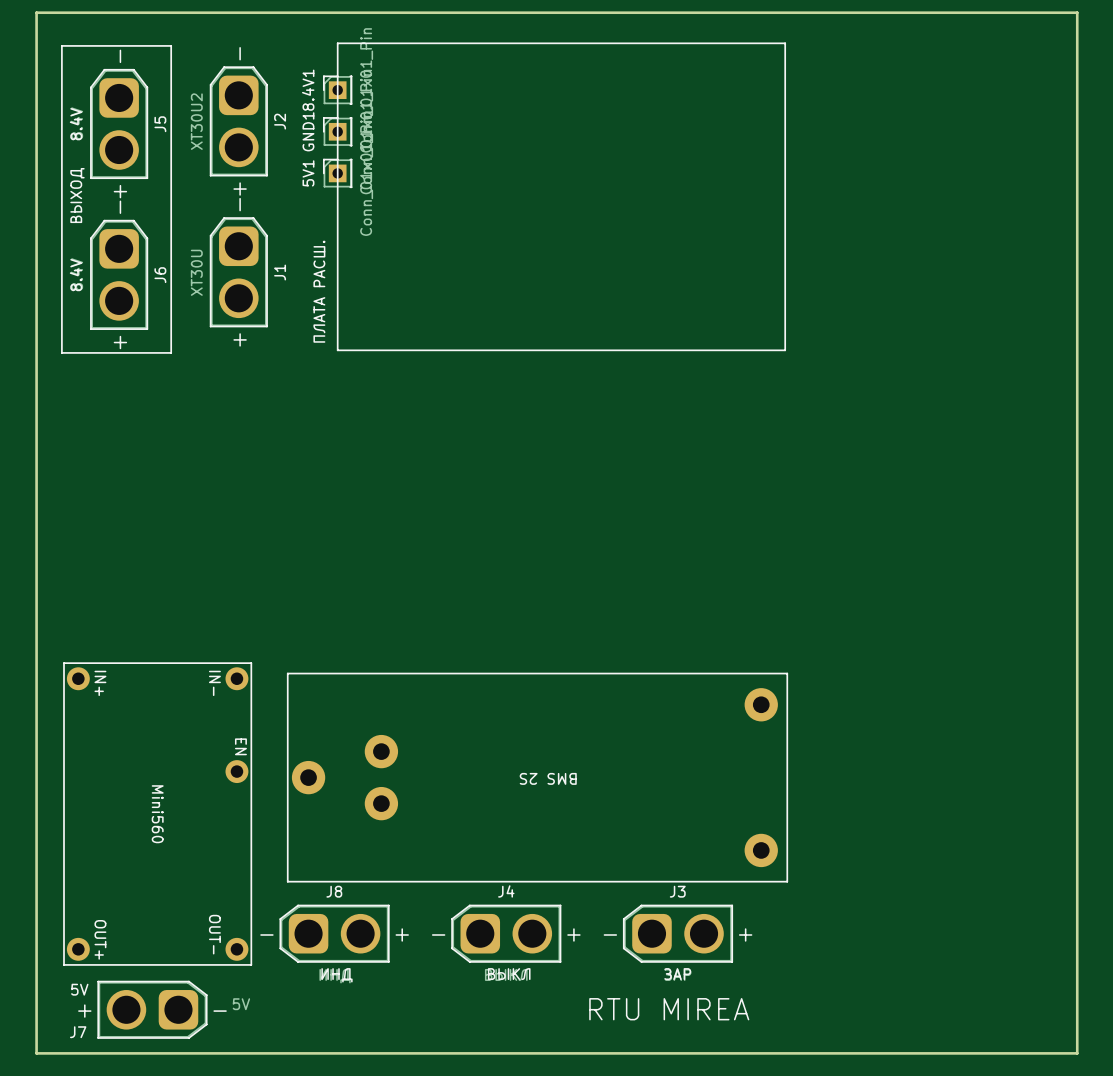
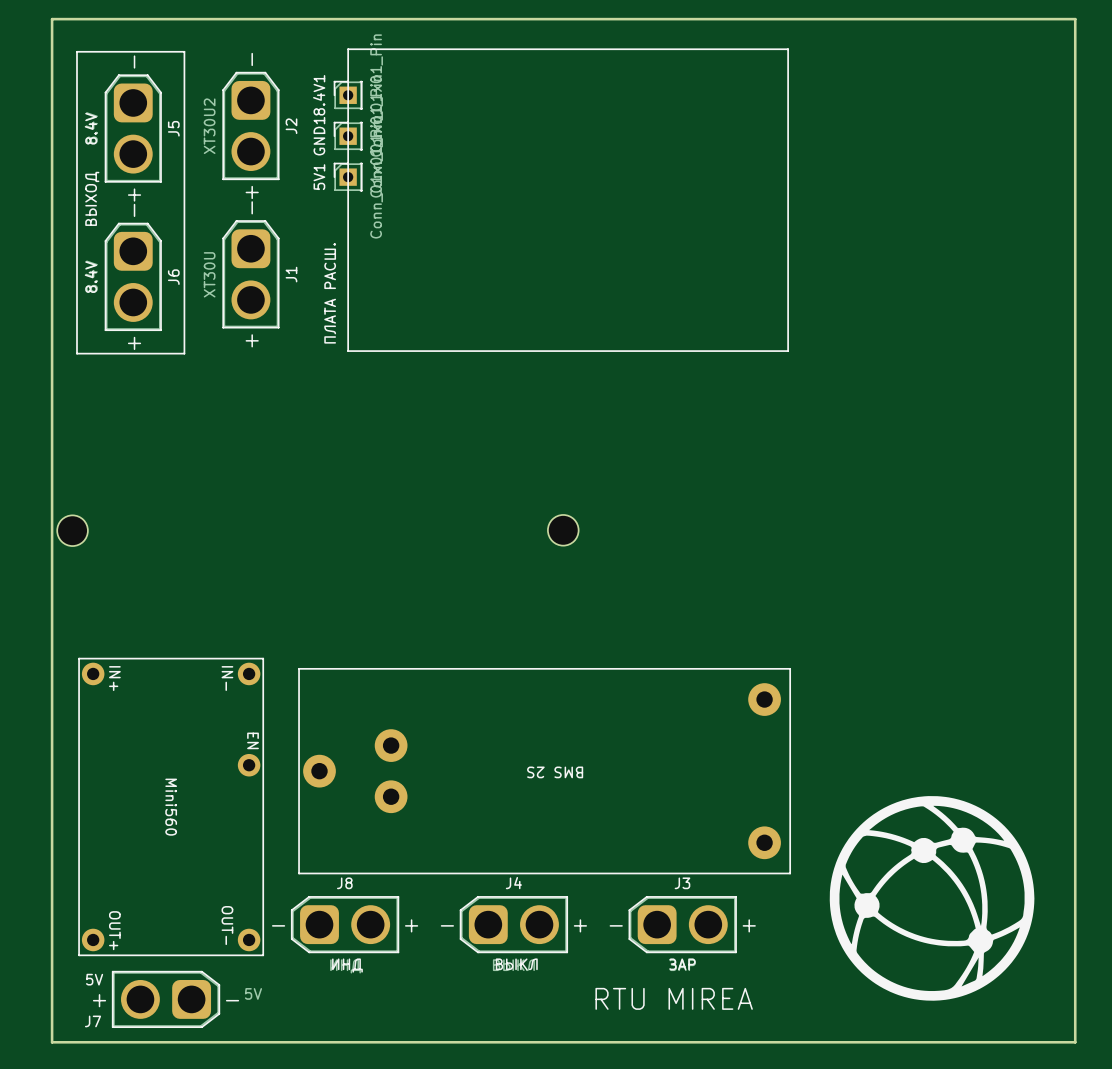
part: none -> (563, 530)
part: none -> (72, 530)
drawing: none -> [829, 796, 1035, 1001]

